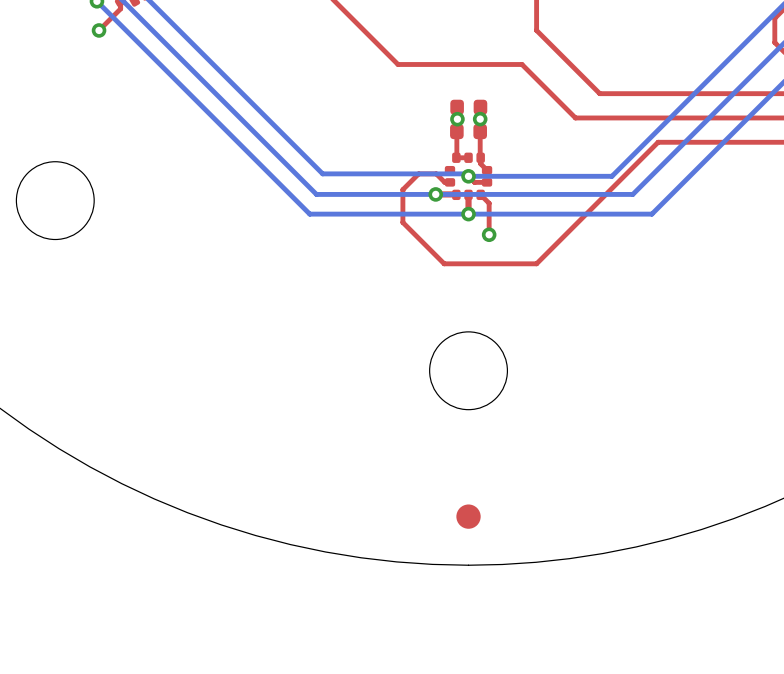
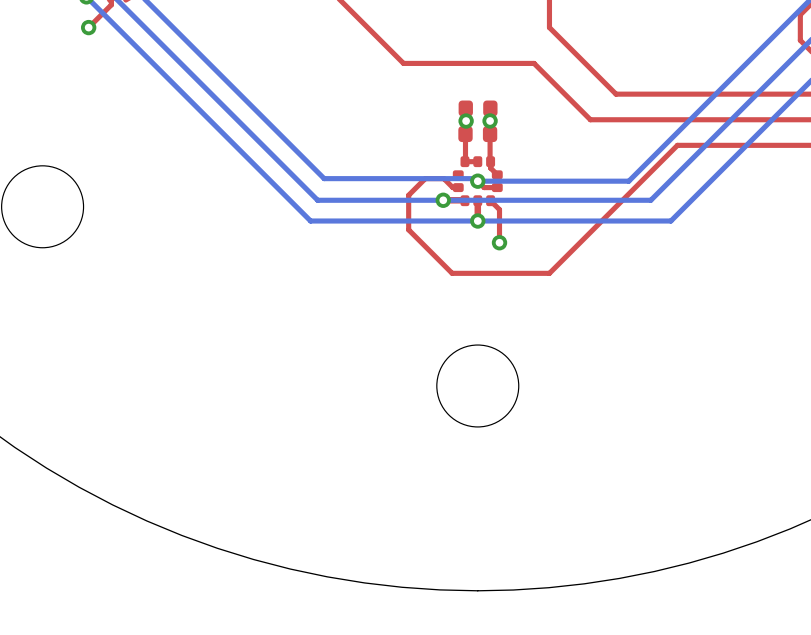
part: (468, 516) -> none

